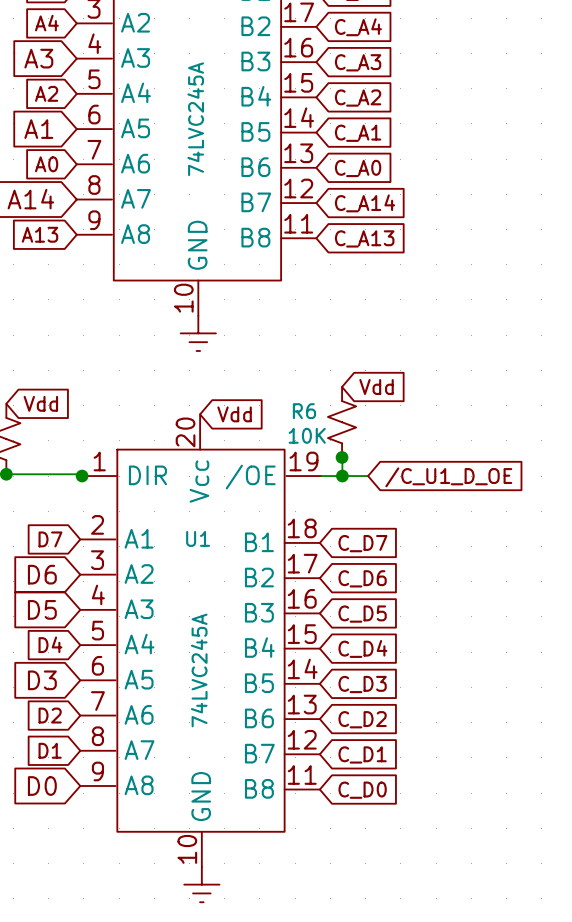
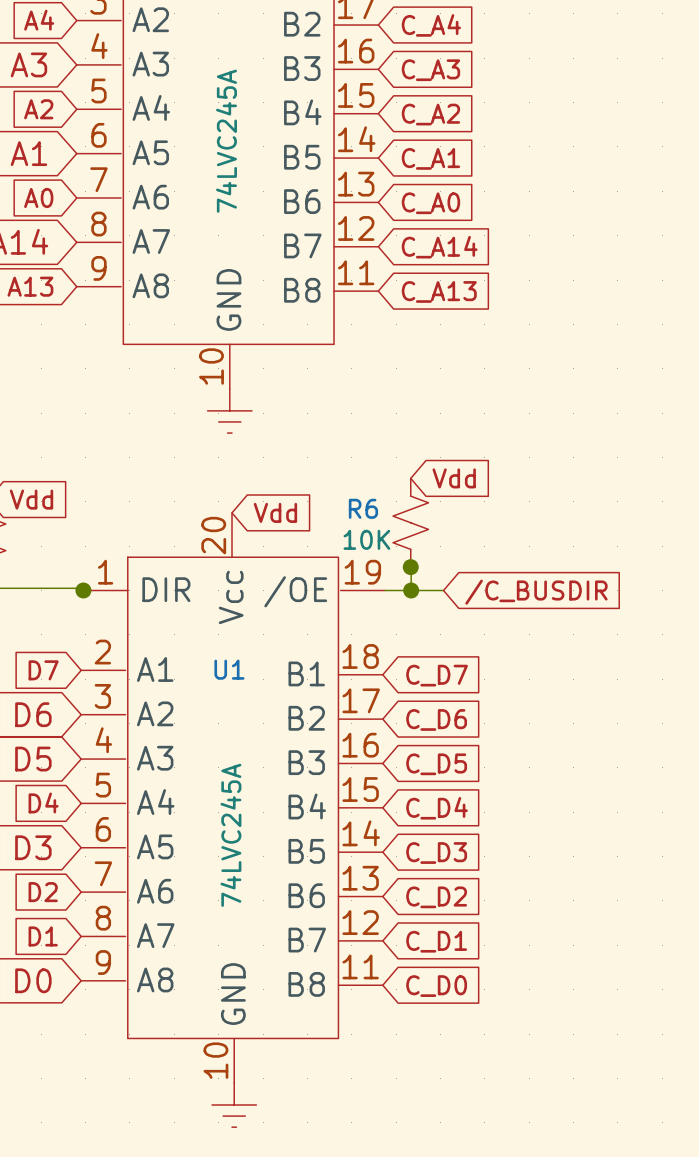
global label: /C_U1_D_OE (448, 477) -> /C_BUSDIR (536, 592)

